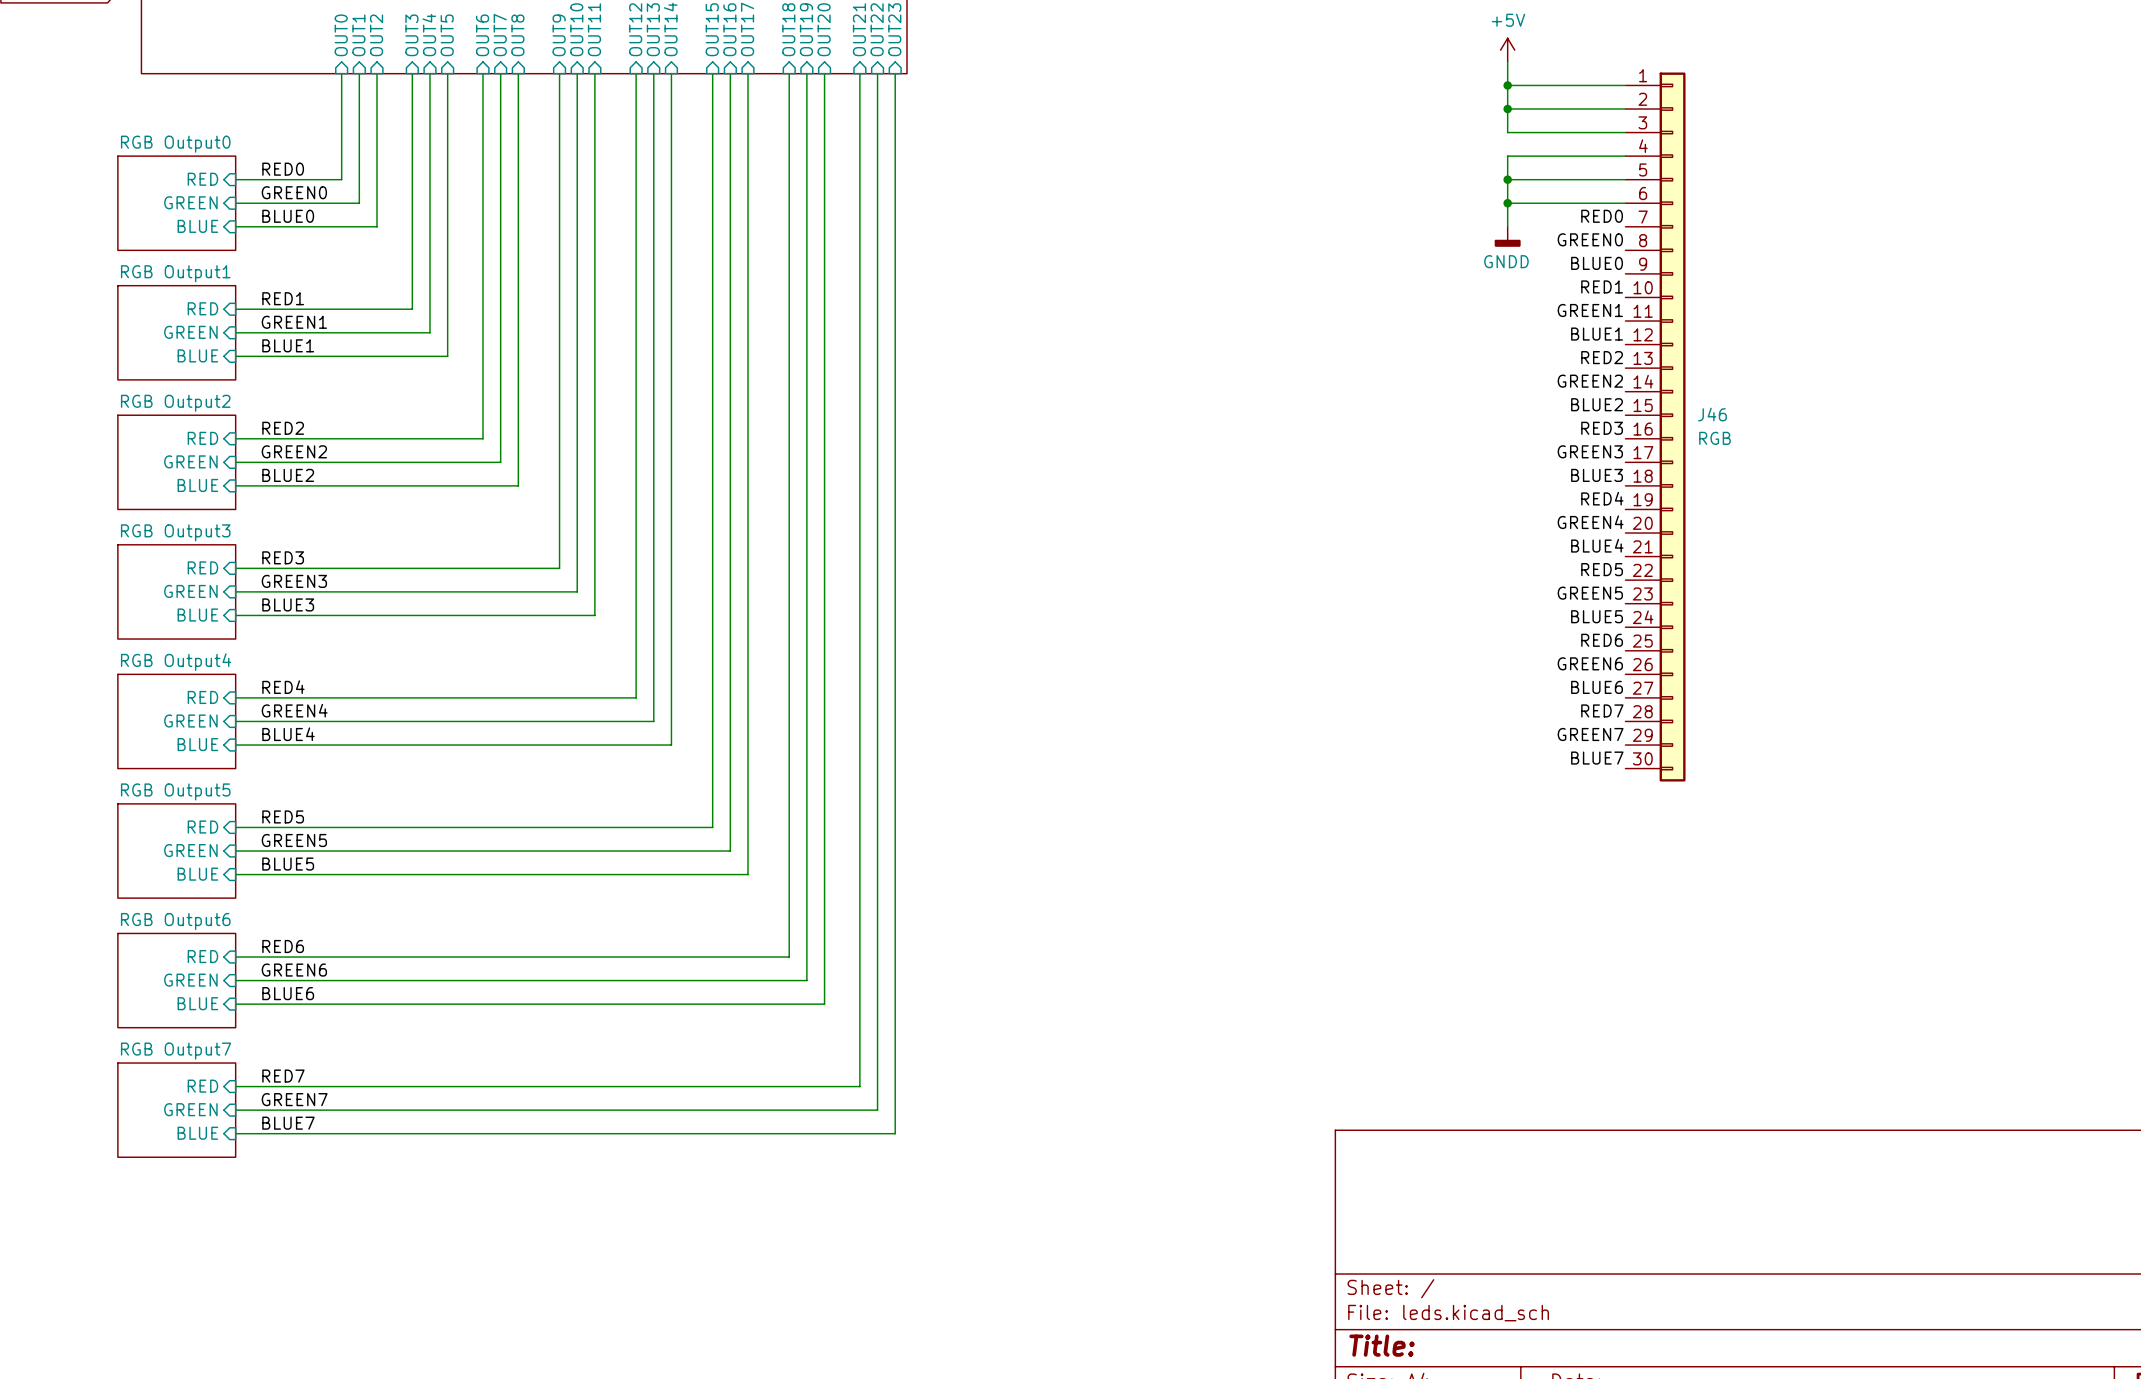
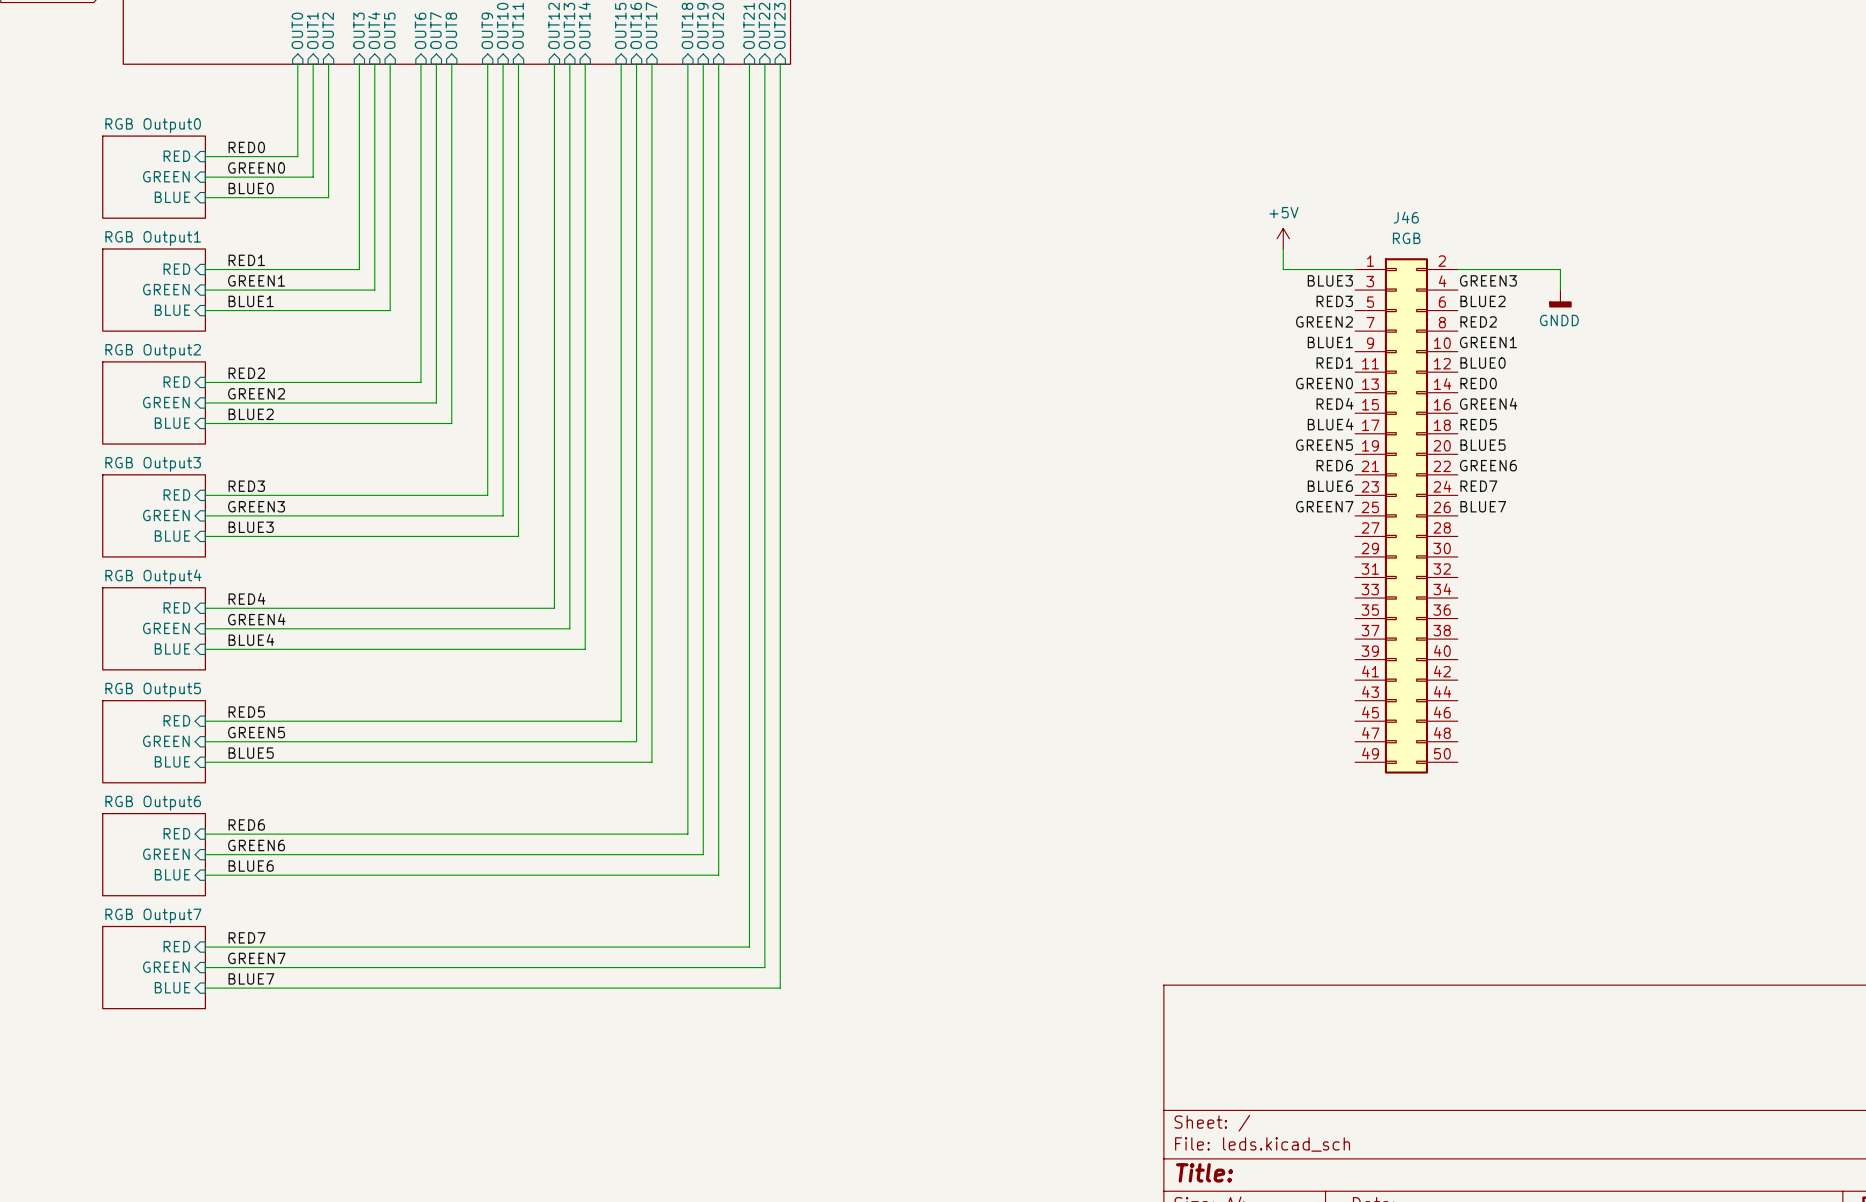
power symbol position: +5V (1507, 50) -> +5V (1283, 238)
wire: (1507, 61) (1507, 132) (1625, 132) -> none
J46 symbol: [1625, 72, 1686, 782] -> [1355, 258, 1458, 774]
wire: (1507, 85) (1625, 85) -> none
junction: (1507, 85) -> none
wire: (1507, 109) (1625, 109) -> none
junction: (1507, 109) -> none
wire: (1625, 156) (1507, 156) (1507, 226) -> none
wire: (1507, 179) (1625, 179) -> none
junction: (1507, 179) -> none
wire: (1507, 203) (1625, 203) -> none
junction: (1507, 203) -> none
label position: RED0 (1602, 216) -> RED0 (1478, 383)
power symbol: GNDD (1507, 236) -> none
label position: GREEN0 (1590, 239) -> GREEN0 (1324, 383)
label position: BLUE0 (1597, 263) -> BLUE0 (1483, 363)
wire: none -> (1283, 248) (1283, 269) (1355, 269)
label position: RED1 (1602, 286) -> RED1 (1334, 363)
wire: none -> (1457, 269) (1560, 269) (1560, 290)
label position: GREEN1 (1590, 310) -> GREEN1 (1488, 342)
label position: BLUE1 (1597, 334) -> BLUE1 (1330, 342)
power symbol: none -> GNDD (1560, 298)
label position: RED2 (1602, 357) -> RED2 (1478, 321)
label position: GREEN2 (1590, 381) -> GREEN2 (1324, 321)
label position: BLUE2 (1597, 404) -> BLUE2 (1483, 301)
J46 name position: J46 (1712, 414) -> J46 (1406, 217)
label position: RED3 (1602, 428) -> RED3 (1334, 301)
J46 value position: RGB (1714, 438) -> RGB (1406, 238)
label position: GREEN3 (1590, 451) -> GREEN3 (1488, 280)
label position: BLUE3 (1597, 475) -> BLUE3 (1330, 280)
label position: RED4 (1602, 498) -> RED4 (1335, 403)
label position: GREEN4 (1590, 522) -> GREEN4 (1488, 403)
label position: BLUE4 (1597, 545) -> BLUE4 (1330, 424)
label position: RED5 (1602, 569) -> RED5 (1478, 424)
label position: GREEN5 (1590, 593) -> GREEN5 (1324, 445)
label position: BLUE5 (1597, 616) -> BLUE5 (1483, 445)
label position: RED6 (1602, 640) -> RED6 (1334, 465)
label position: GREEN6 (1590, 663) -> GREEN6 (1488, 465)
label position: BLUE6 (1597, 687) -> BLUE6 (1330, 486)
label position: RED7 (1602, 710) -> RED7 (1478, 486)
label position: GREEN7 (1590, 734) -> GREEN7 (1324, 506)
label position: BLUE7 (1597, 758) -> BLUE7 (1483, 506)

